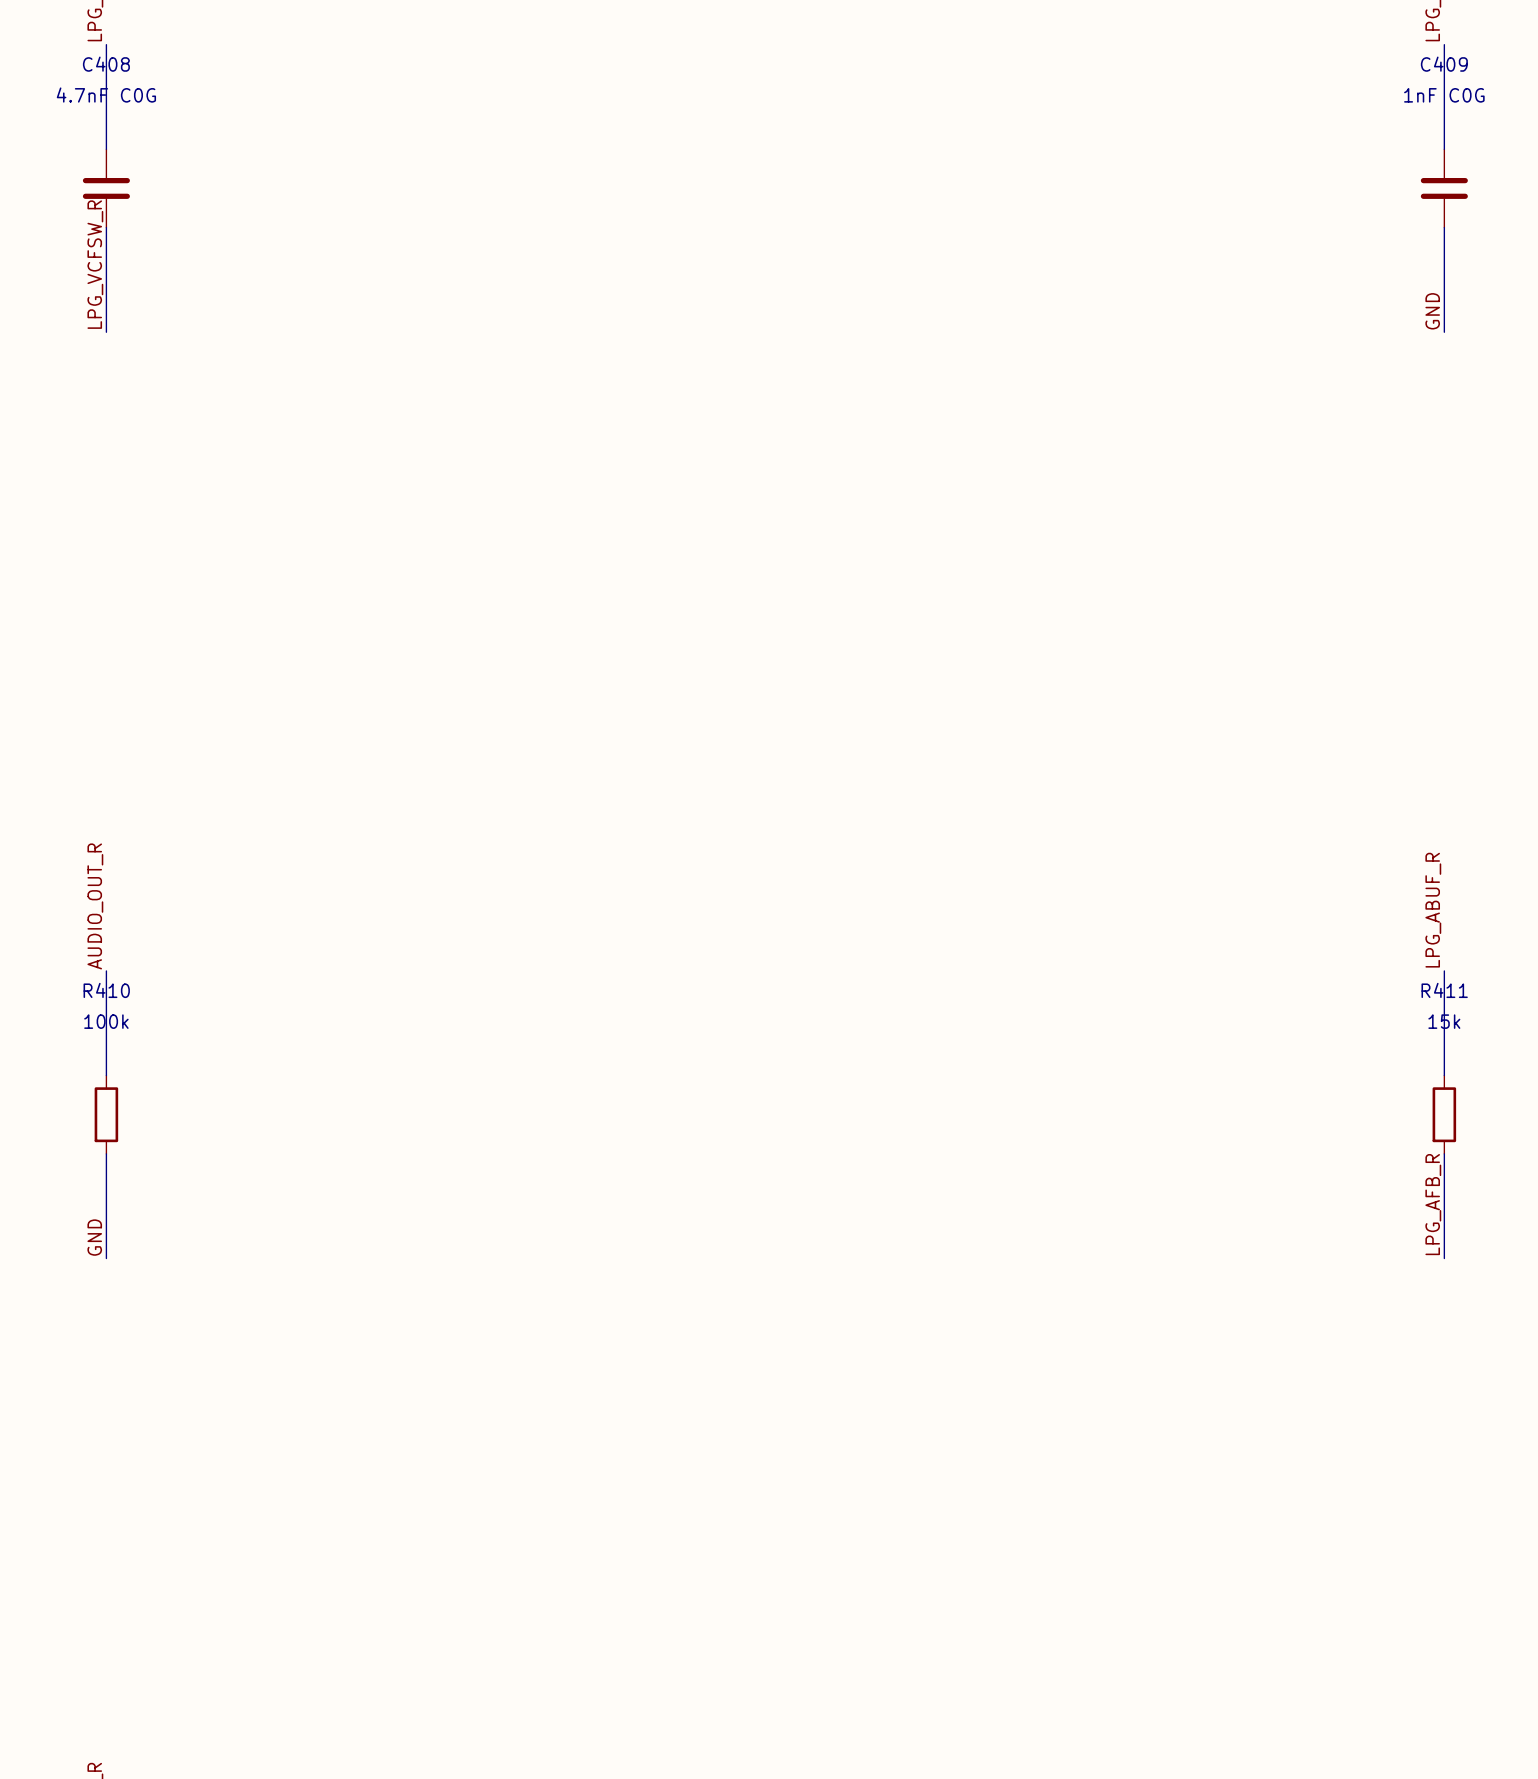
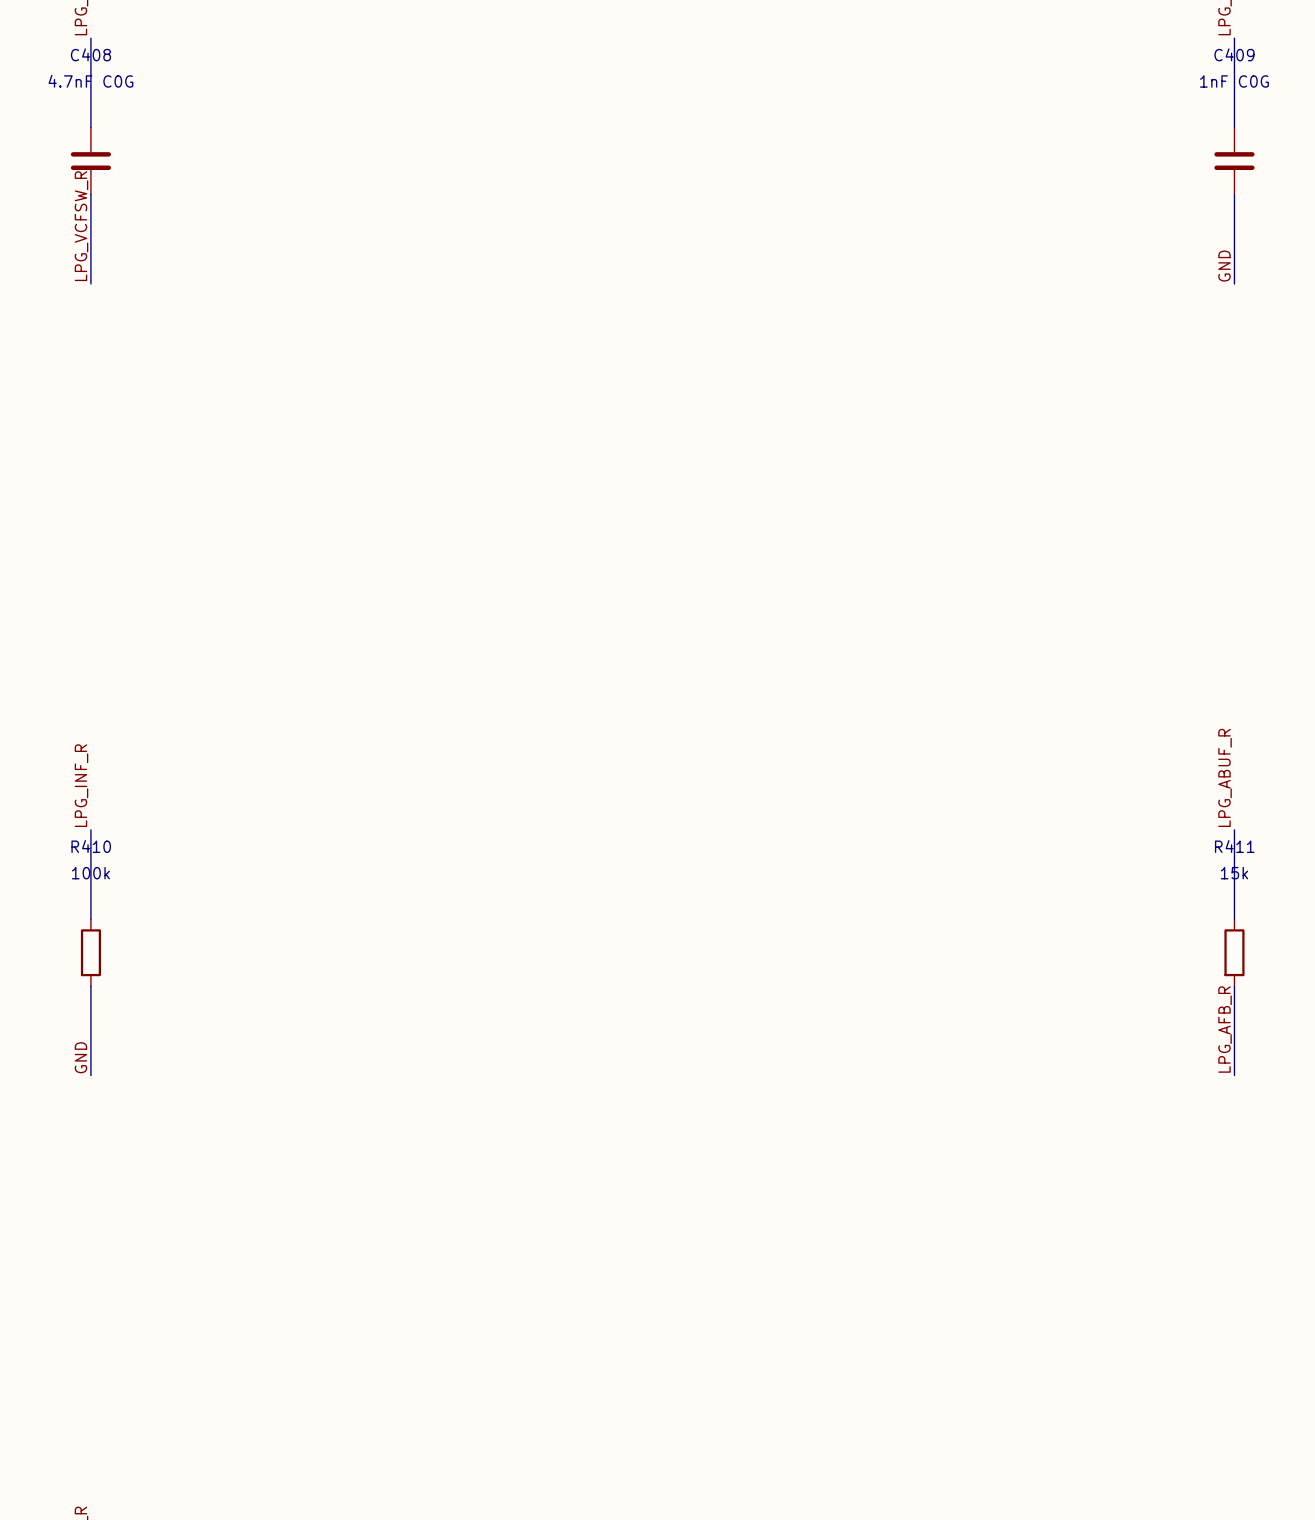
label: AUDIO_OUT_R (95, 906) -> LPG_INF_R (81, 785)

